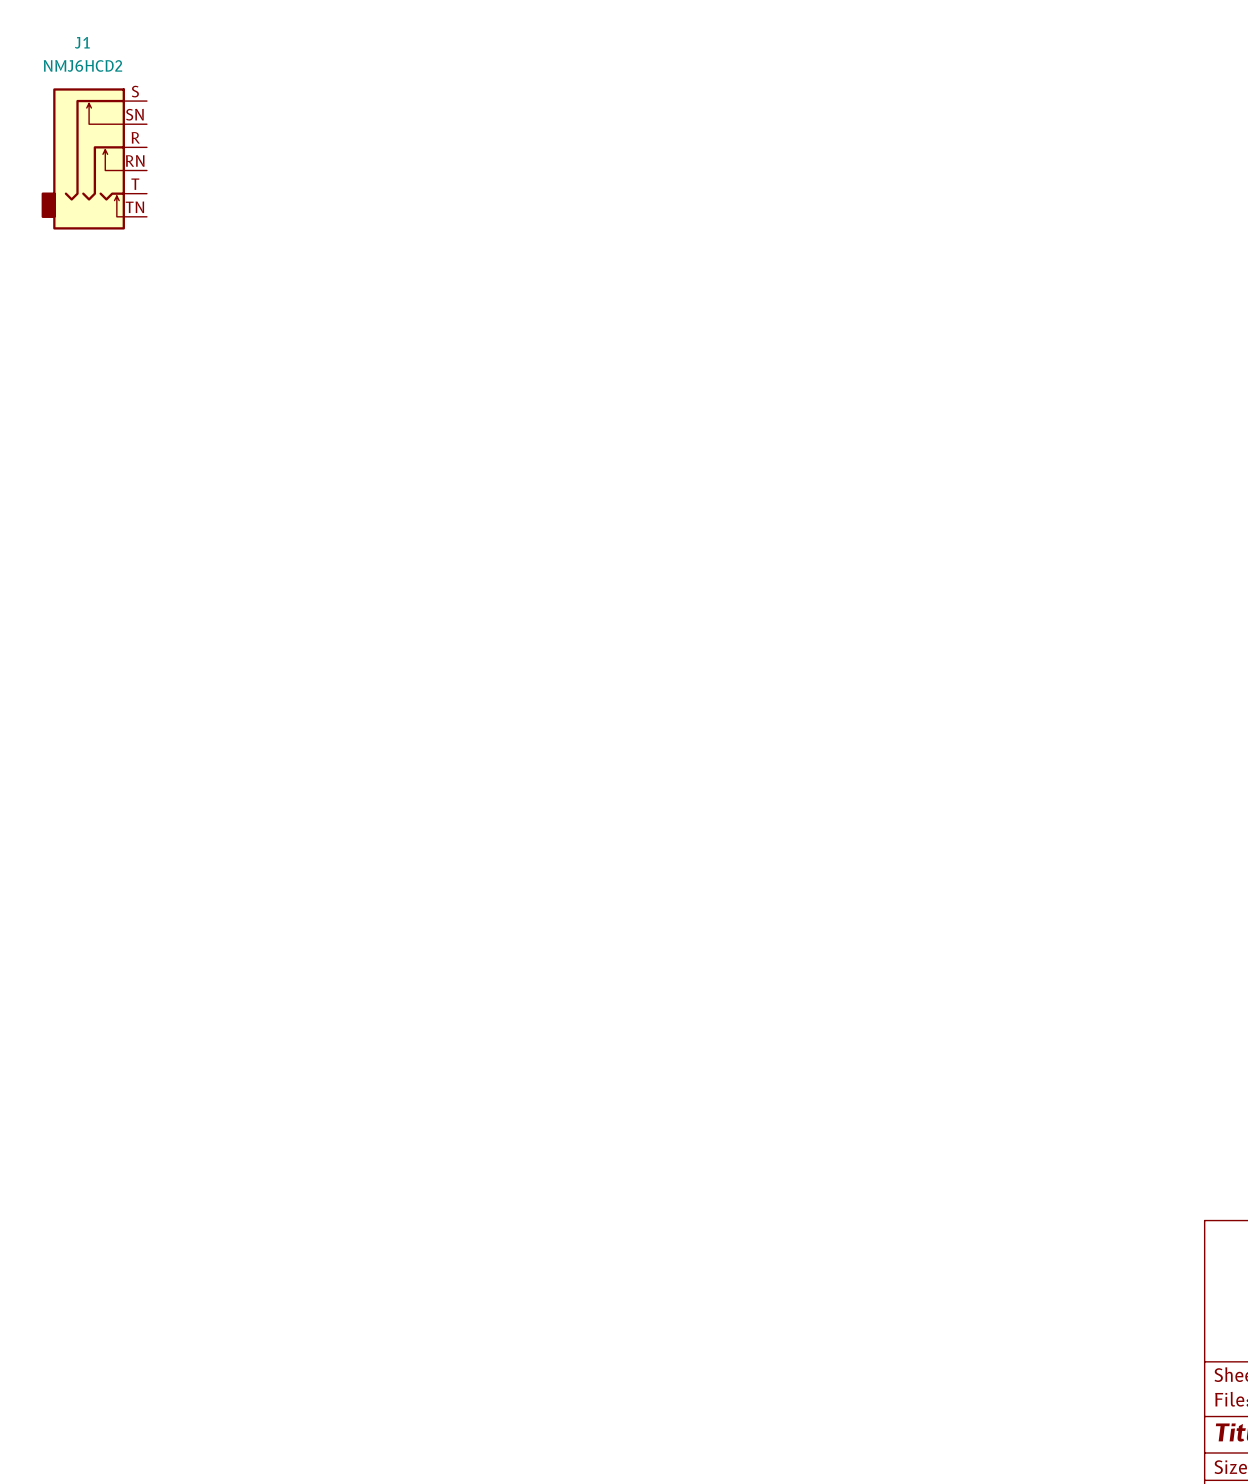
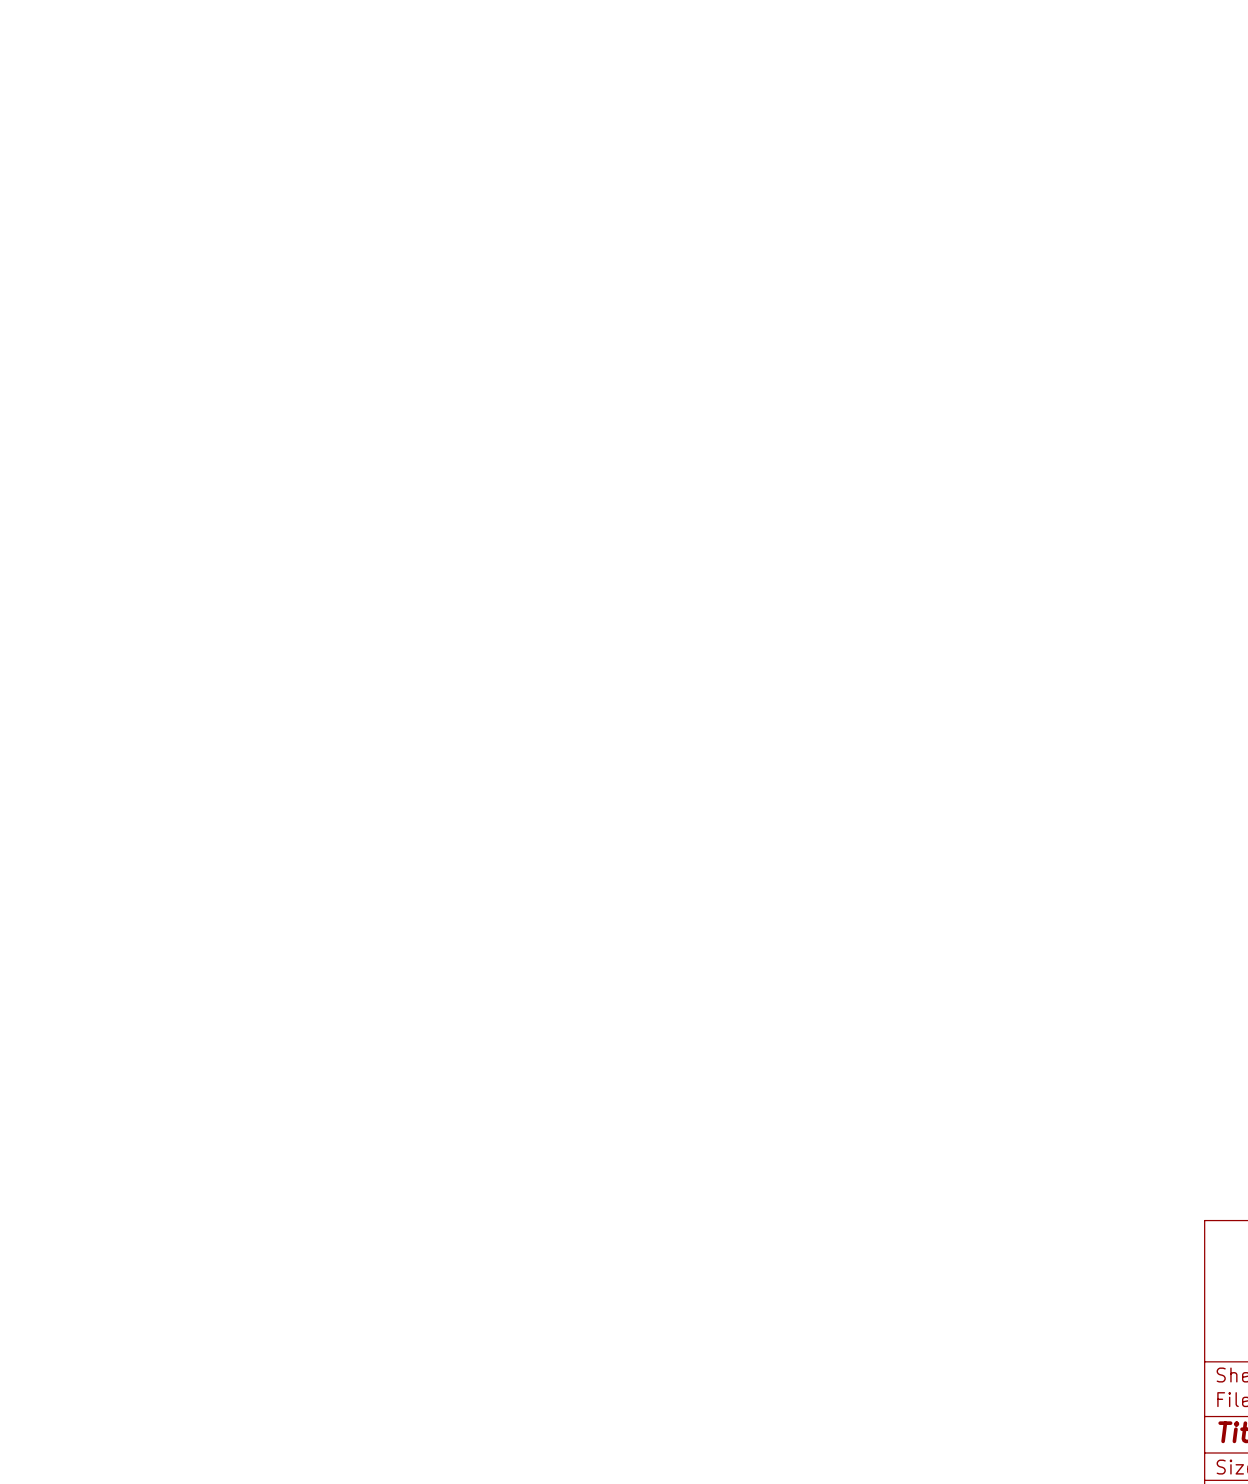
J1: NMJ6HCD2 (94, 158) -> none

